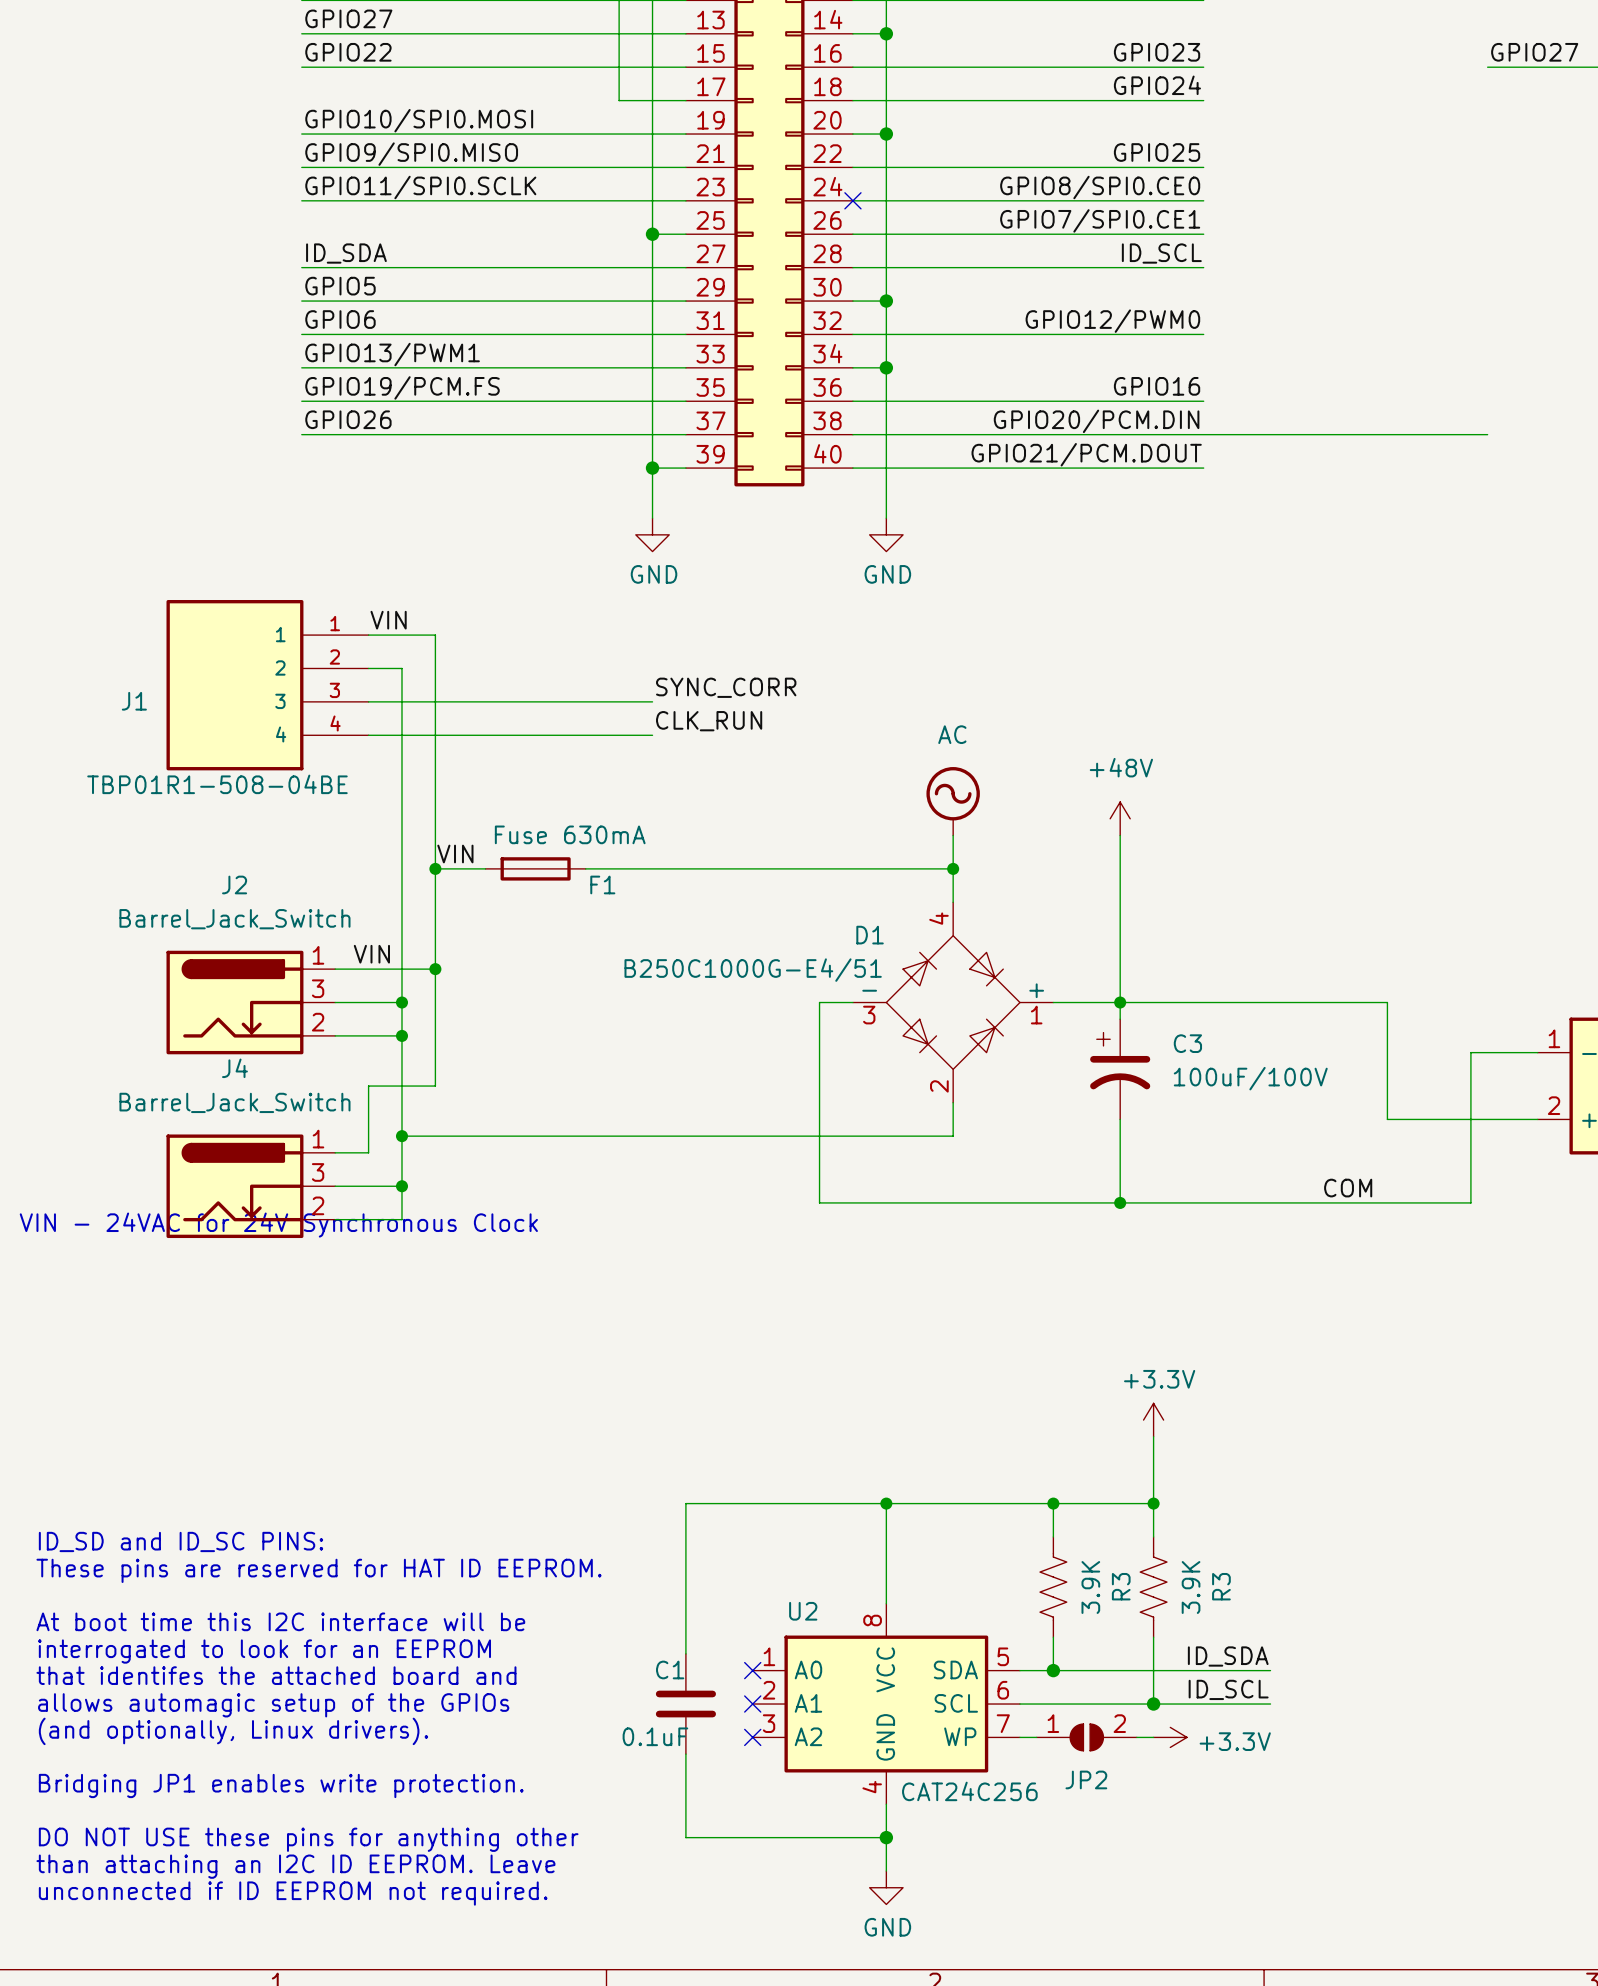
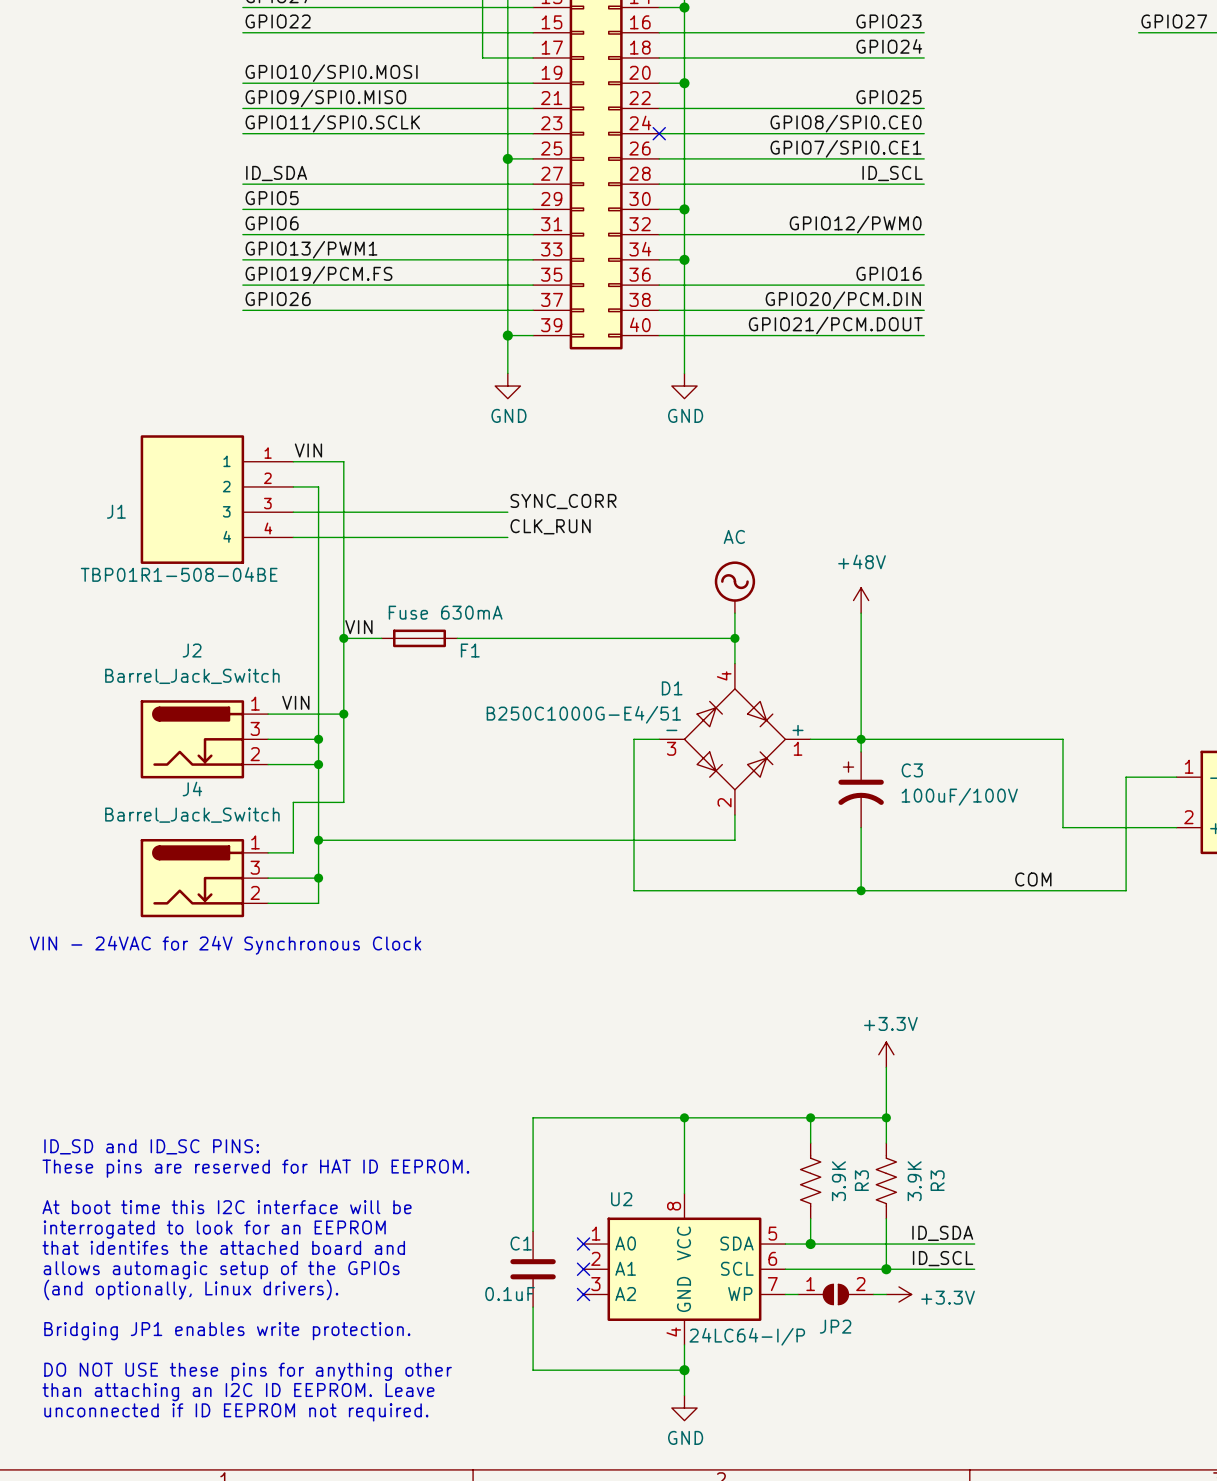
wire: (1203, 434) (1487, 434) -> none
text position: VIN - 24VAC for 24V Synchronous Clock (278, 1225) -> VIN - 24VAC for 24V Synchronous Clock (225, 945)
U2 value: CAT24C256 (969, 1791) -> 24LC64-I/P (747, 1336)

